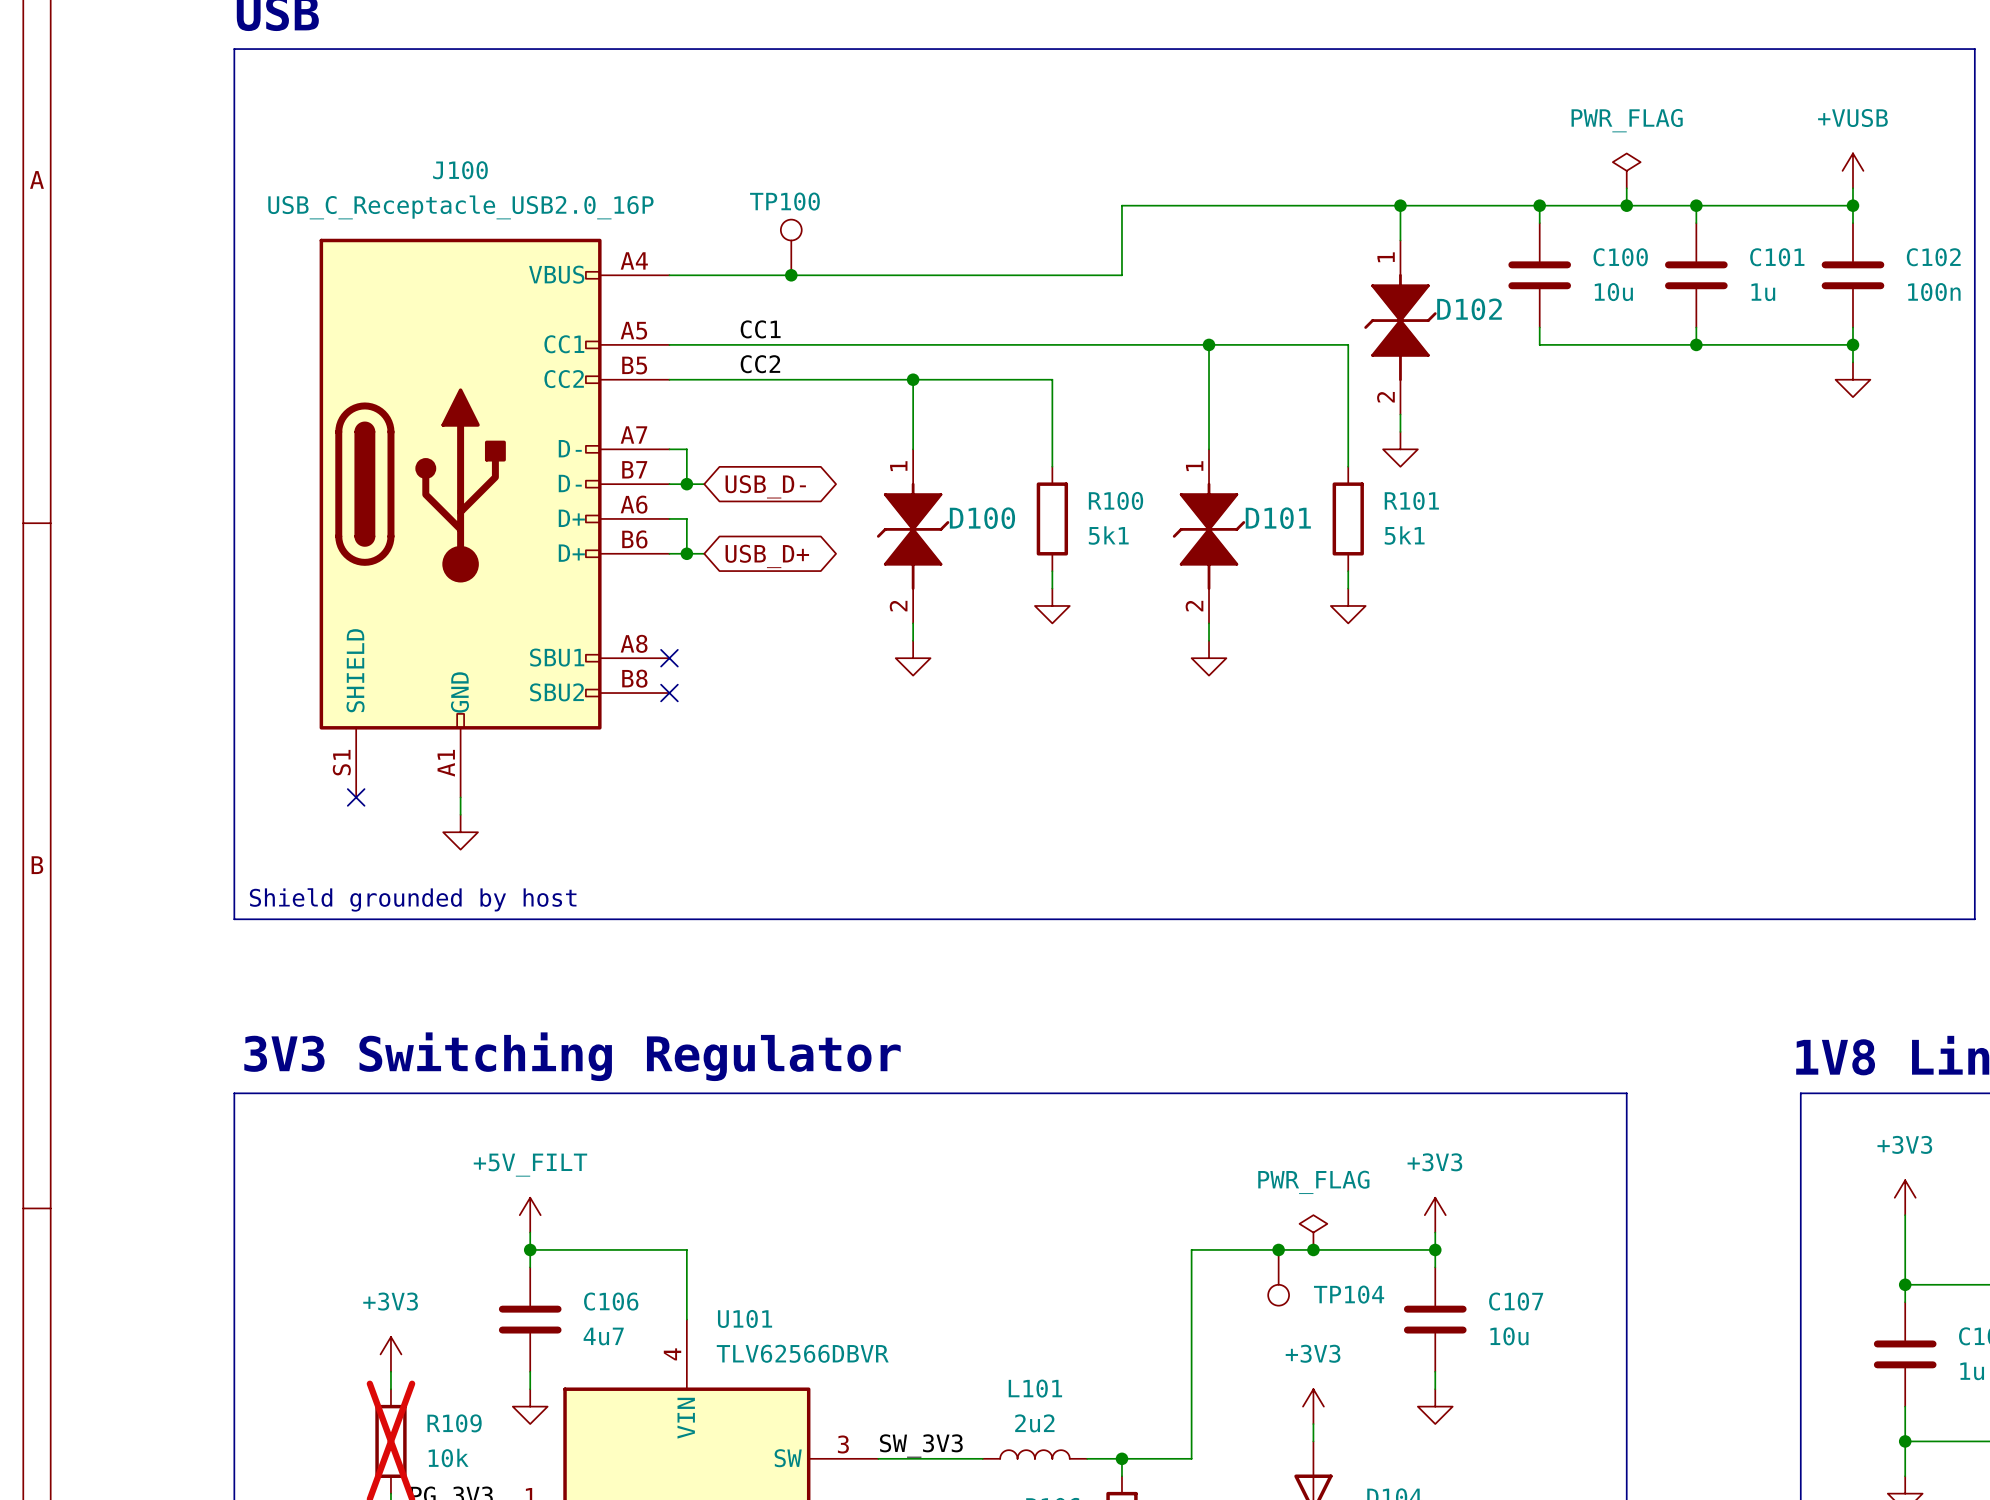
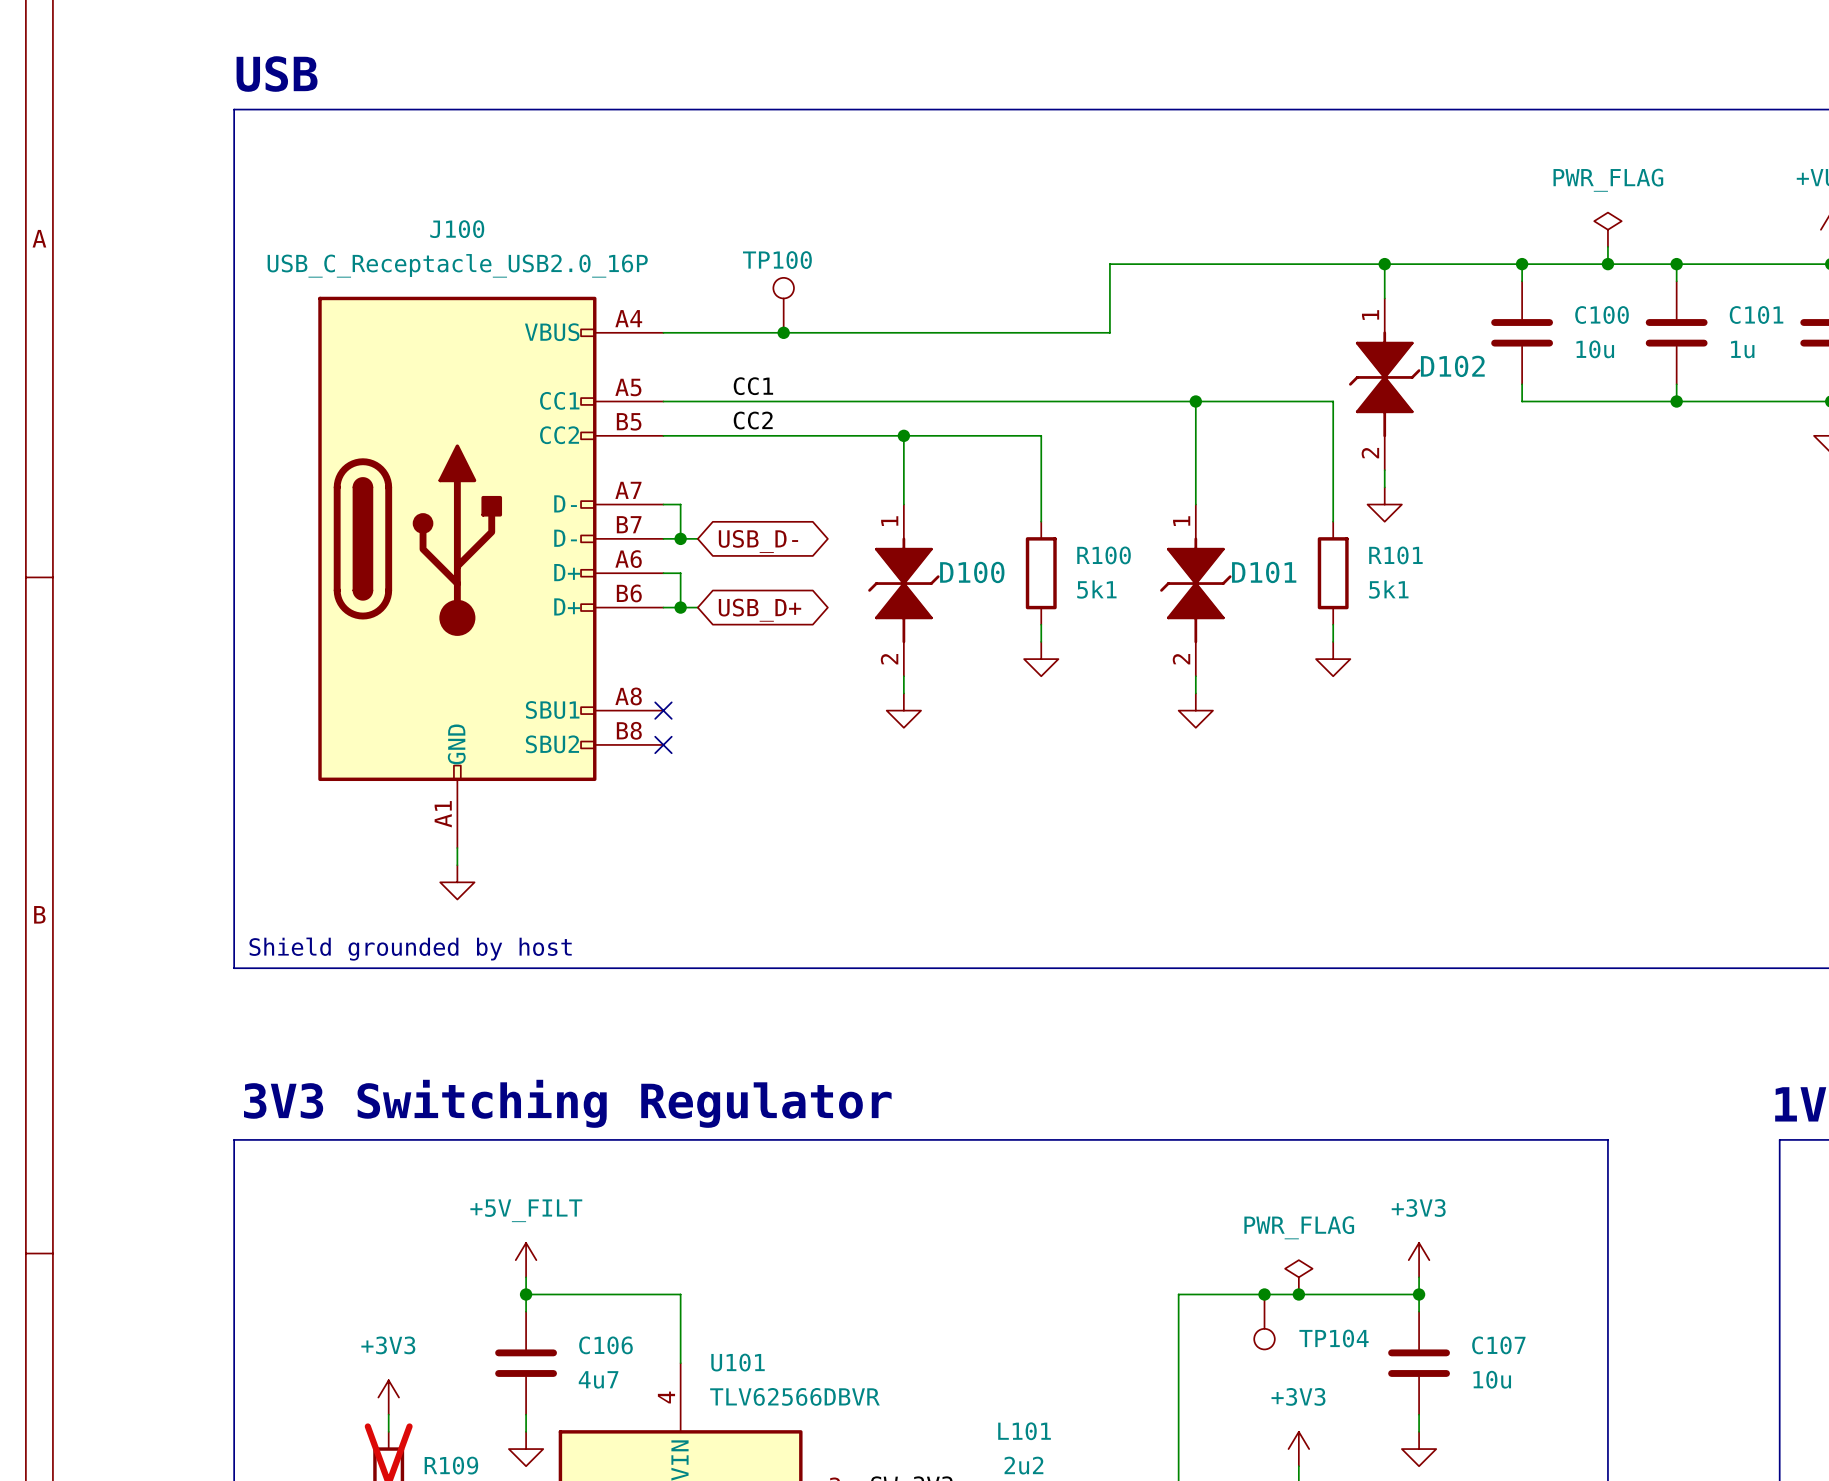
J100 symbol: [319, 238, 670, 798] -> [318, 296, 664, 848]
no-connect mark: (356, 797) -> none

